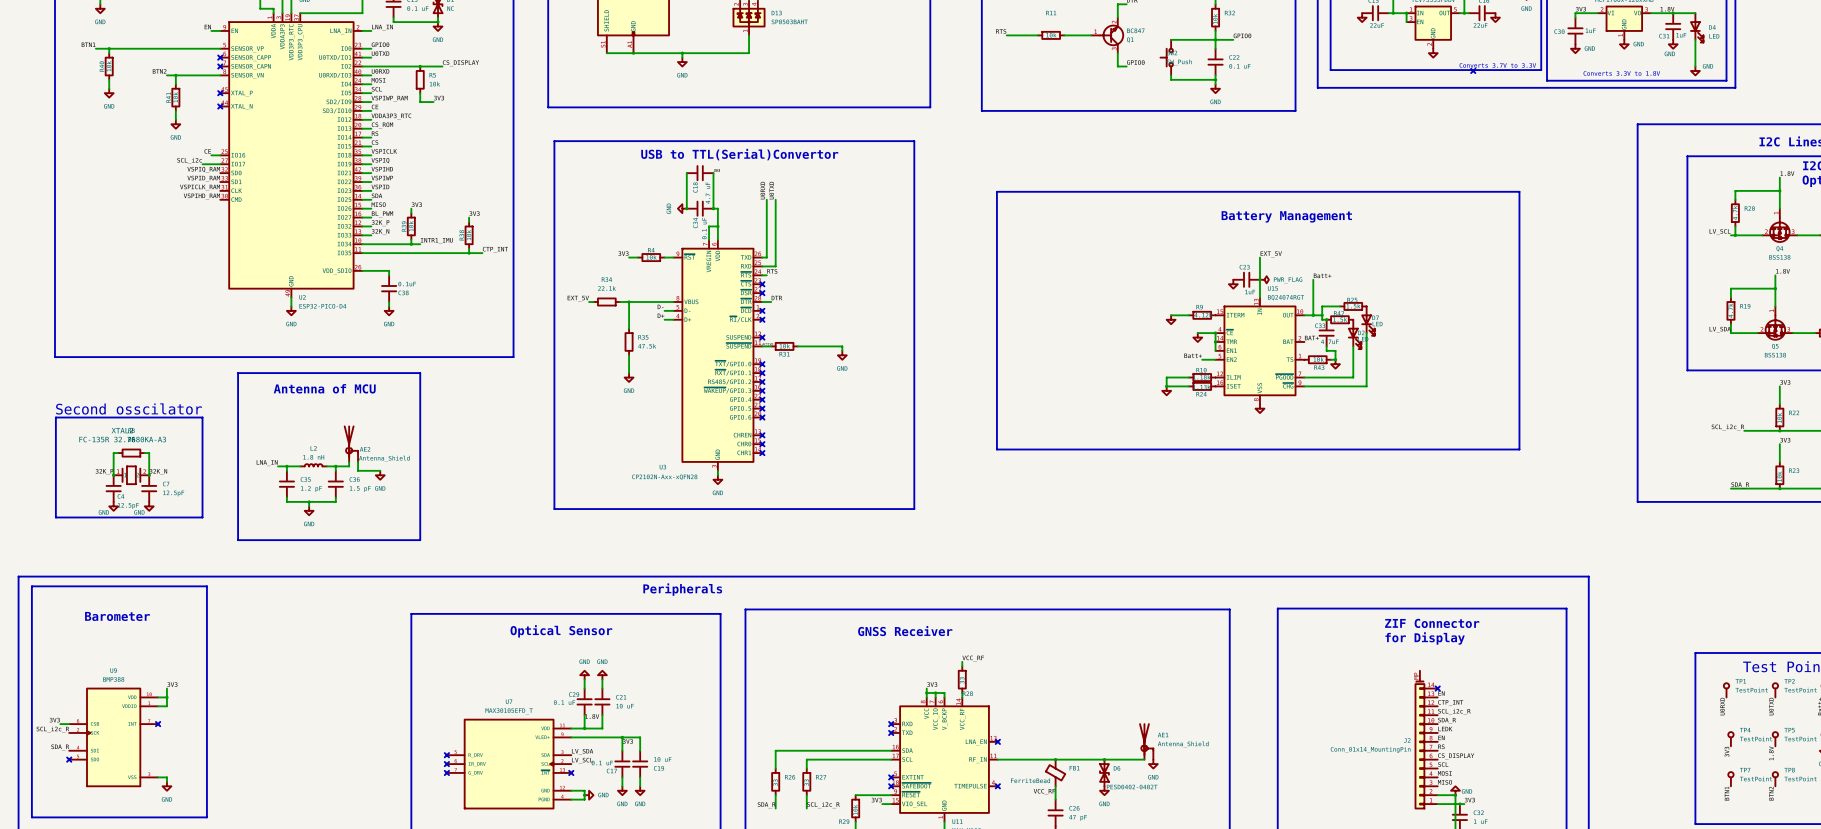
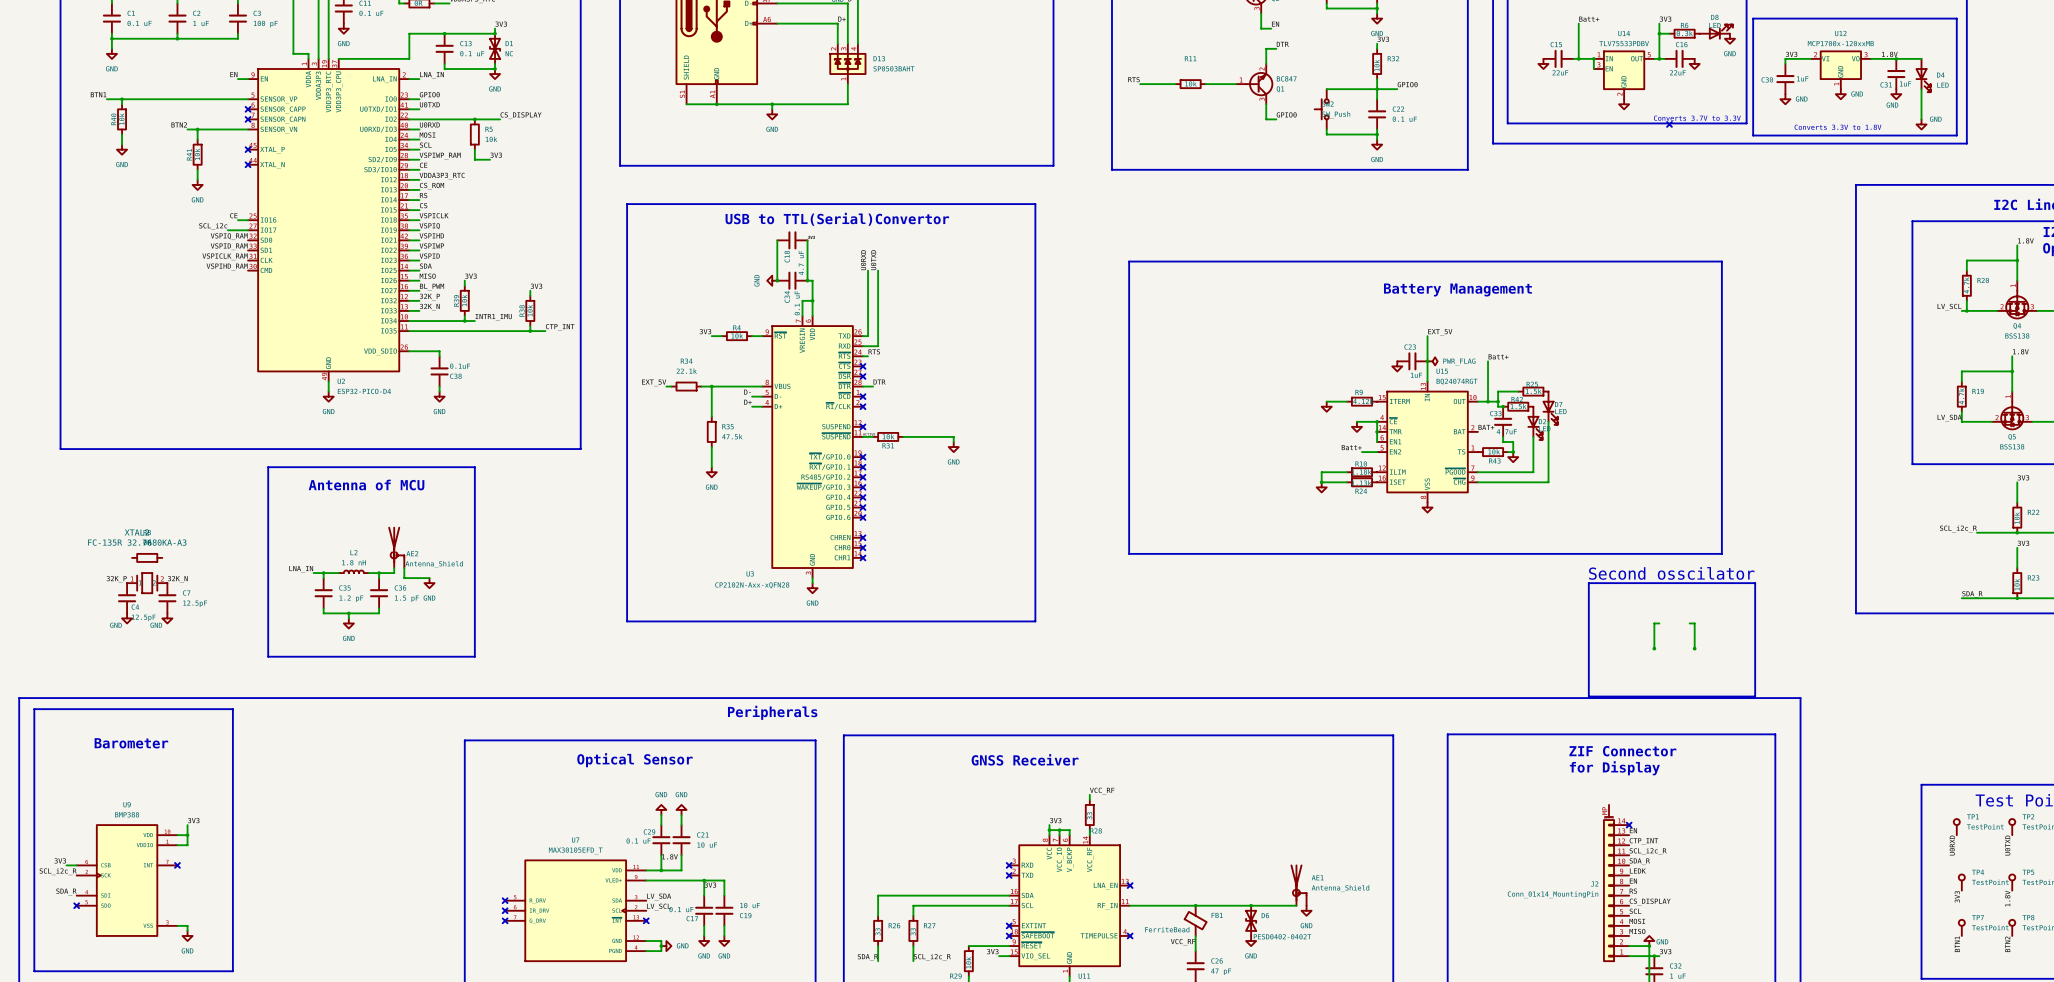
text: Second osscilator (128, 408) -> none
line: (55, 417) (202, 417) (202, 517) (55, 517) (55, 417) -> none
wire: (118, 453) (113, 453) (113, 475) -> none
wire: (144, 453) (149, 453) (149, 475) -> none
text: none -> Second osscilator (1671, 573)
junction: (113, 475) -> none
junction: (149, 475) -> none
line: none -> (1588, 583) (1755, 583) (1755, 696) (1588, 696) (1588, 583)
wire: none -> (1659, 623) (1654, 623) (1654, 648)
wire: none -> (1689, 623) (1694, 623) (1694, 648)
junction: none -> (1654, 648)
junction: none -> (1694, 648)

